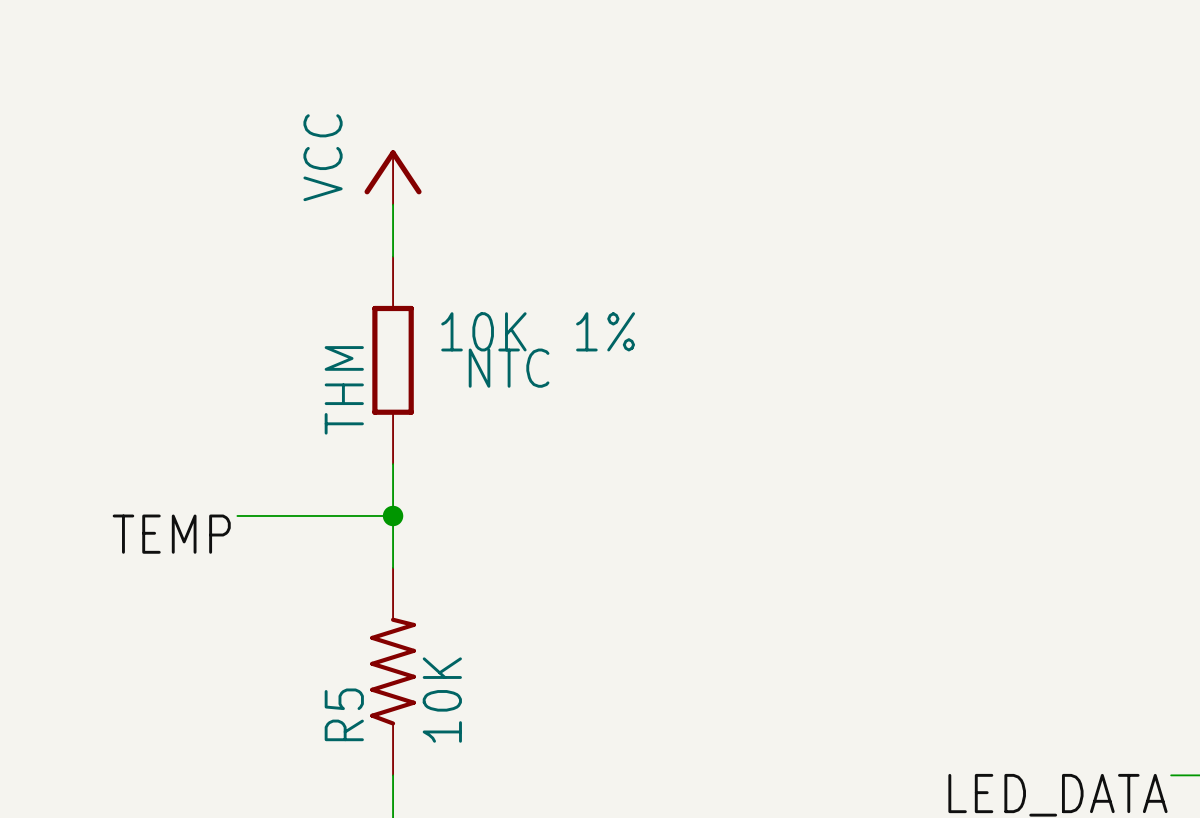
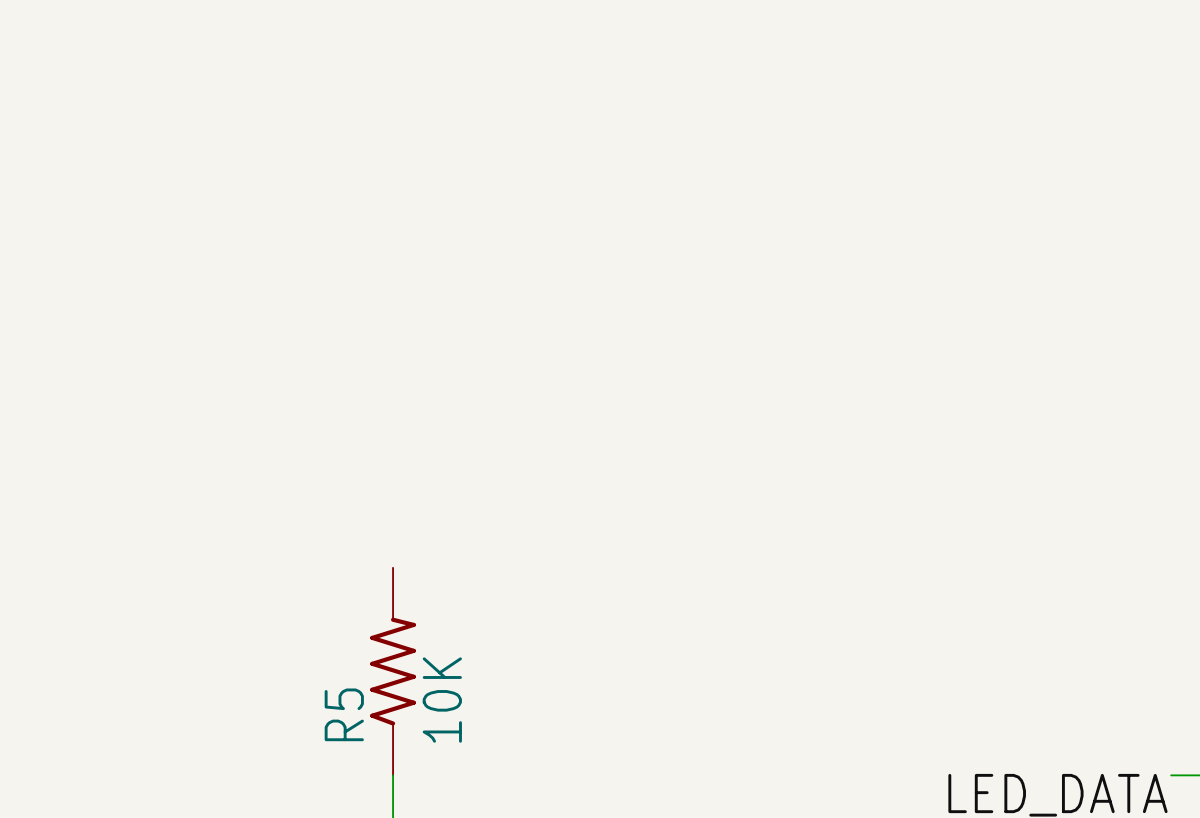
power symbol: VCC (393, 177) -> none
wire: (393, 204) (393, 256) -> none
THM: 10K (393, 360) -> none
wire: (393, 464) (393, 567) -> none
wire: (237, 515) (393, 515) -> none
junction: (393, 515) -> none
label: TEMP (171, 534) -> none

